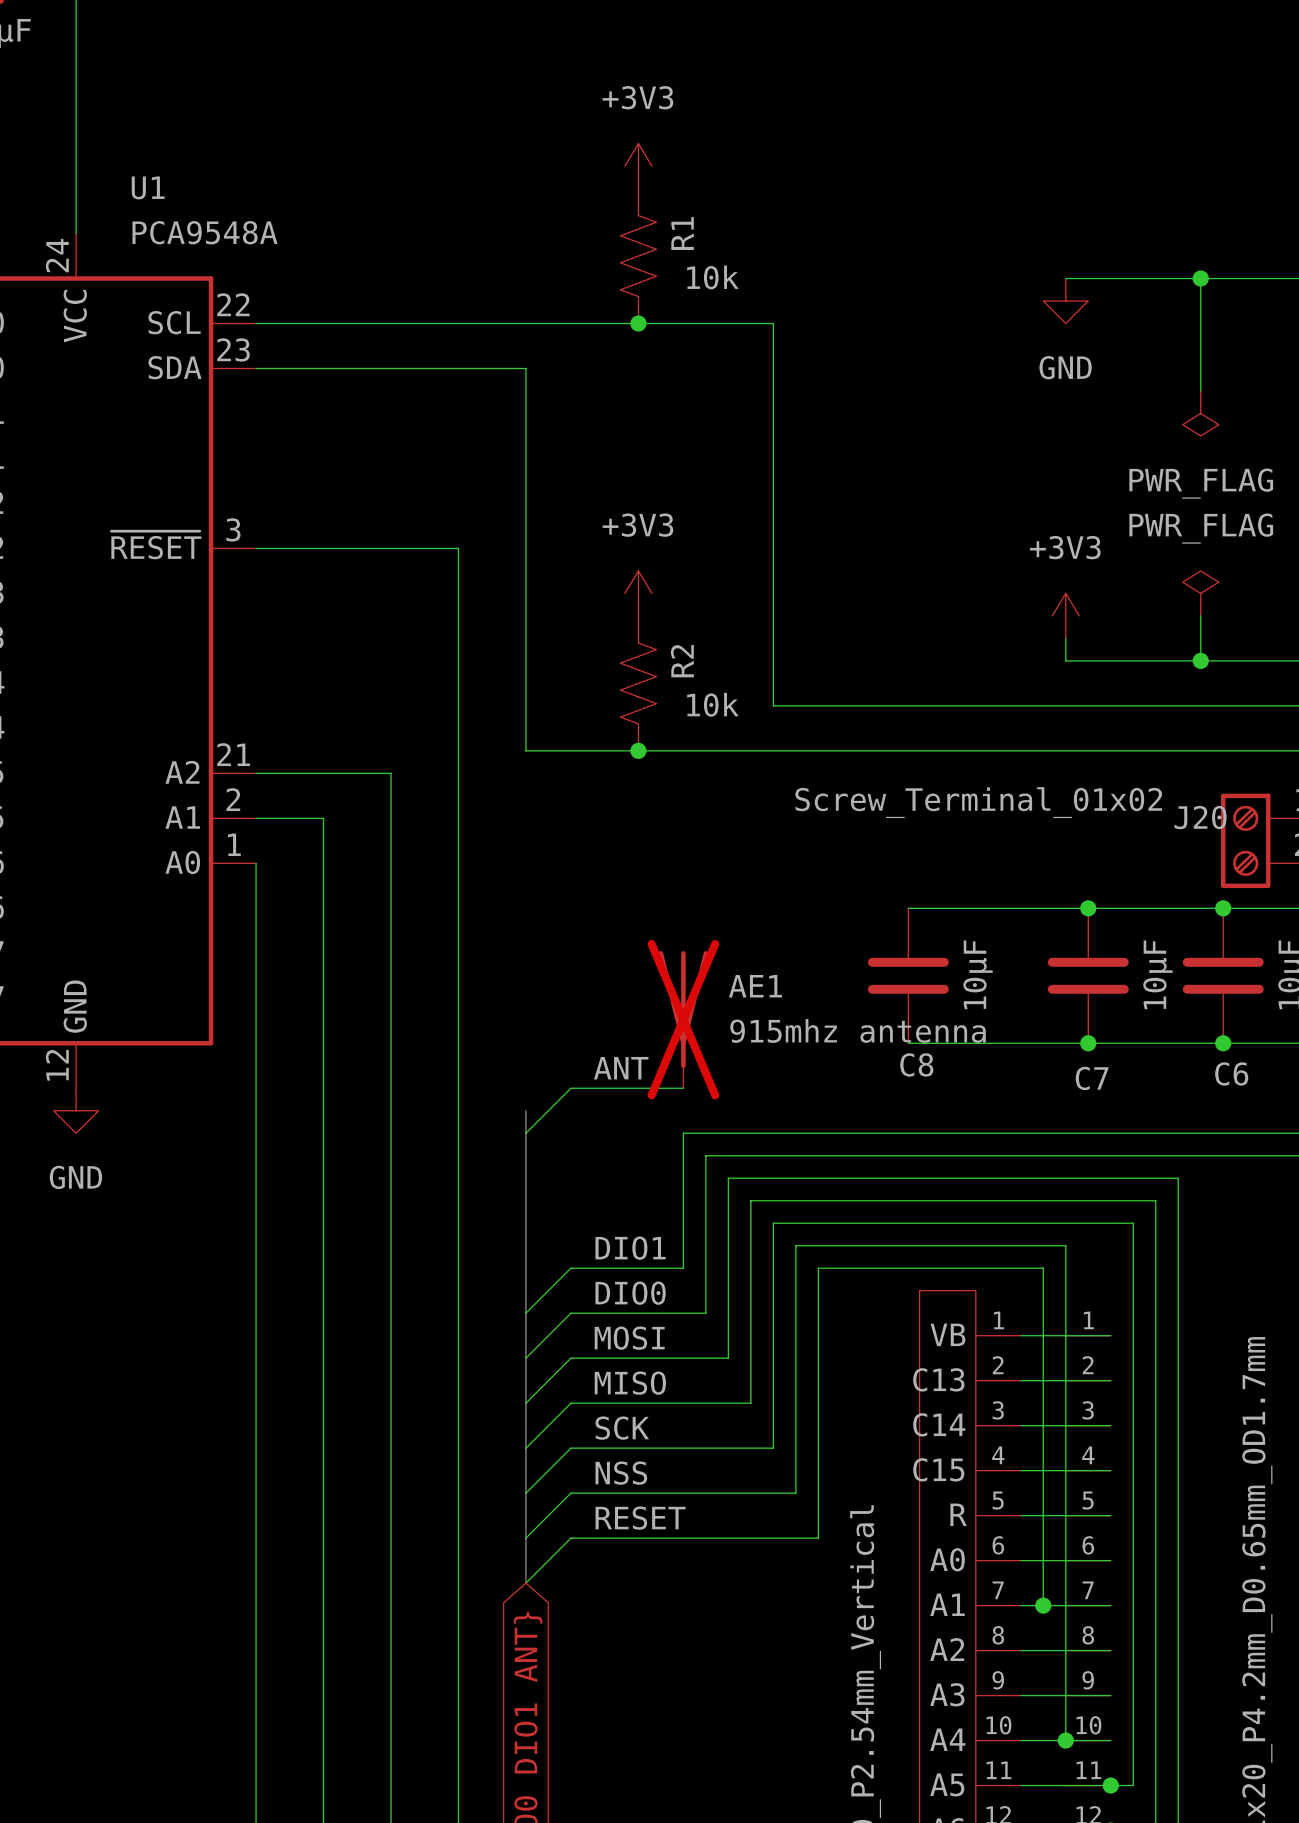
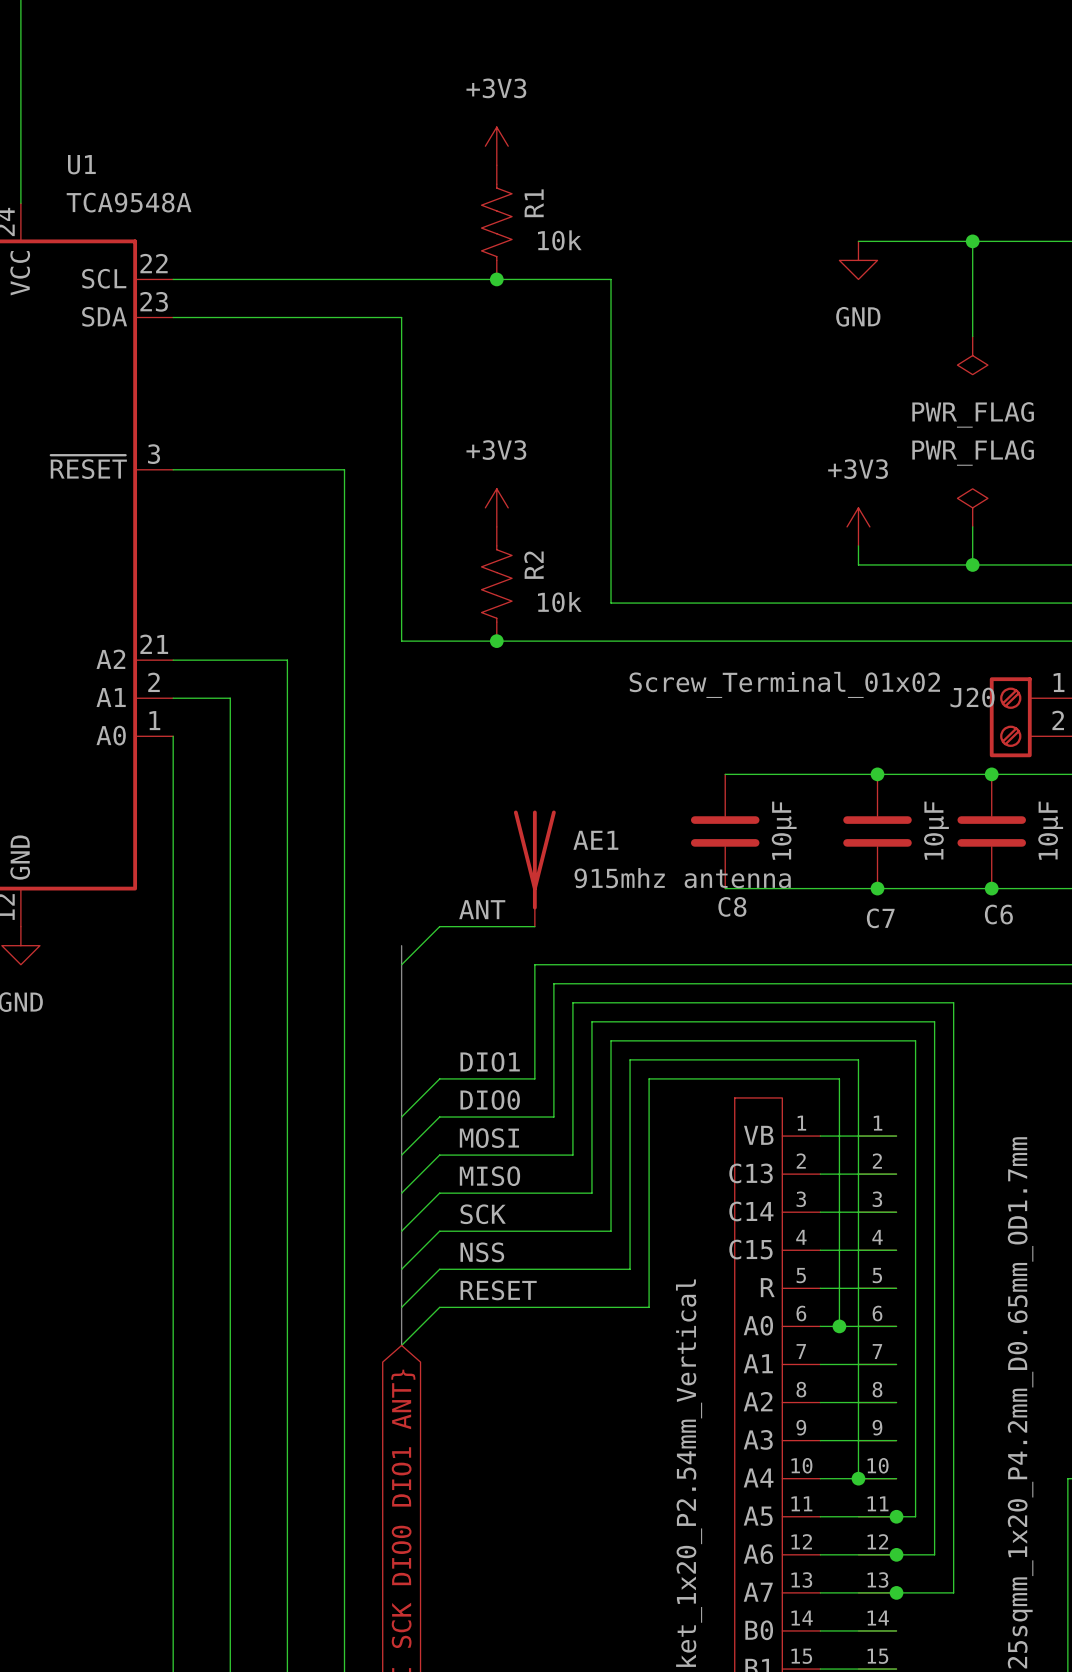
U1 value: PCA9548A (205, 232) -> TCA9548A (129, 202)
AE1 do-not-place cross: (683, 1019) -> none
wire: (1043, 1560) (1043, 1605) -> none
junction position: (1043, 1605) -> (839, 1326)

